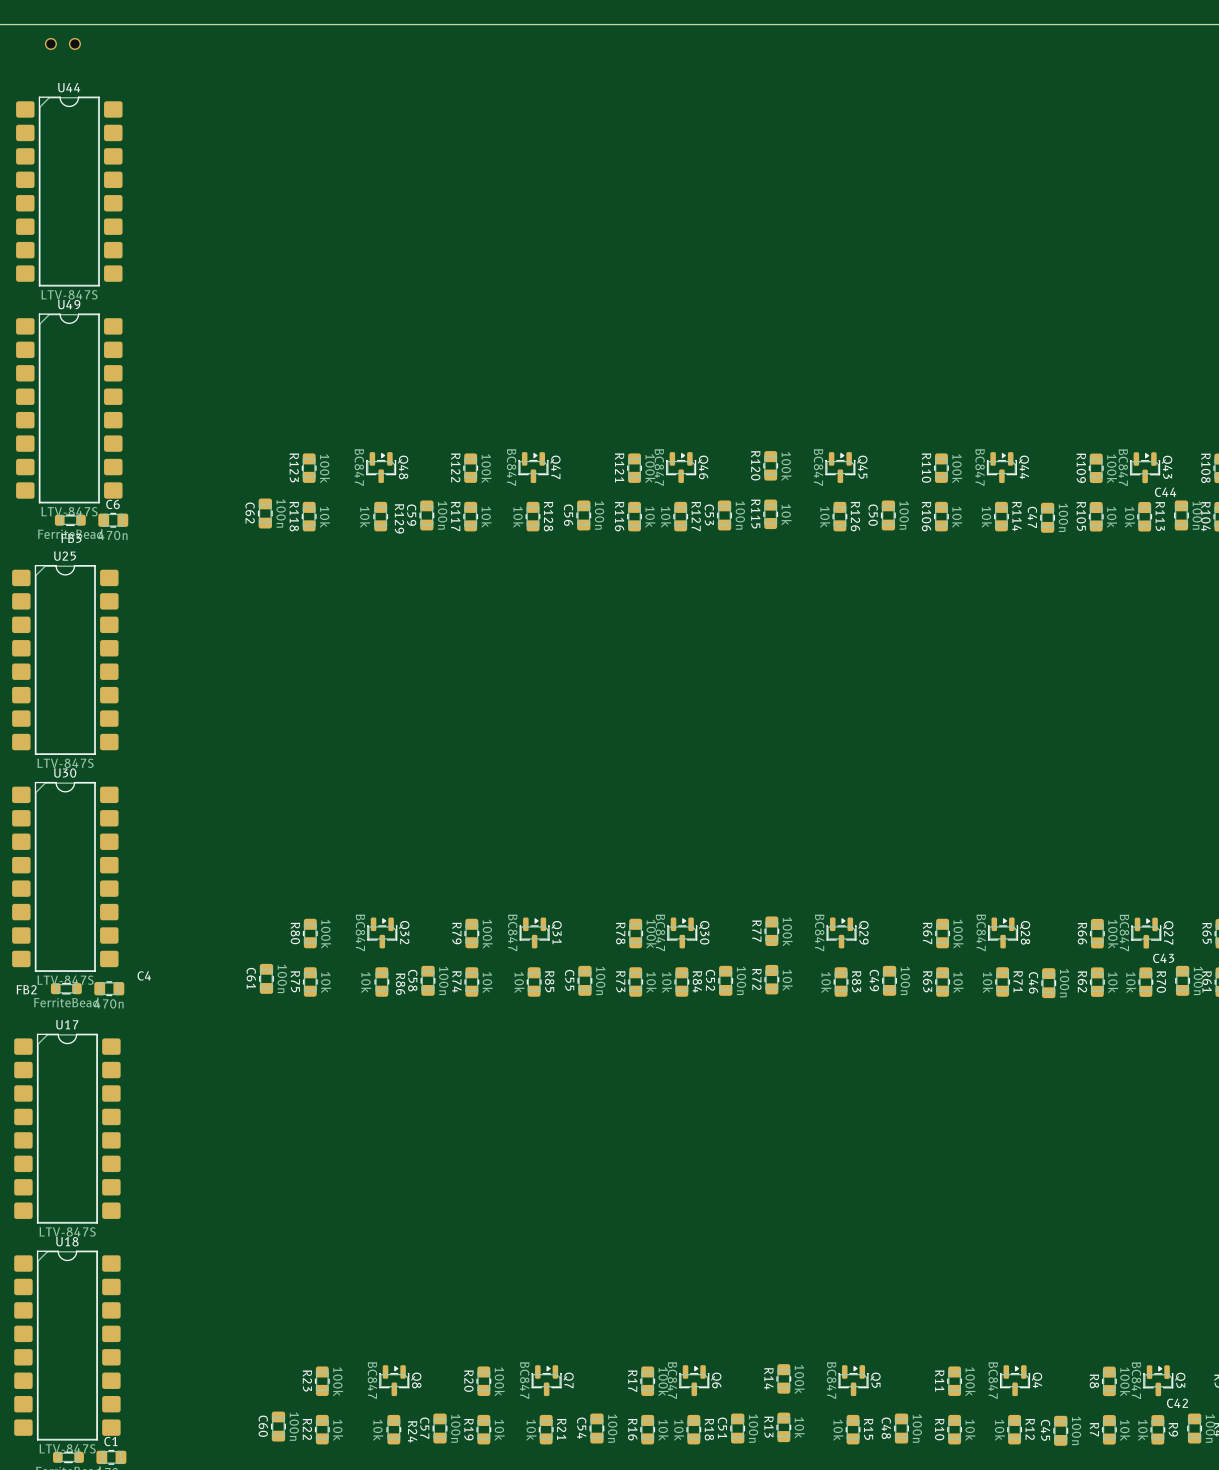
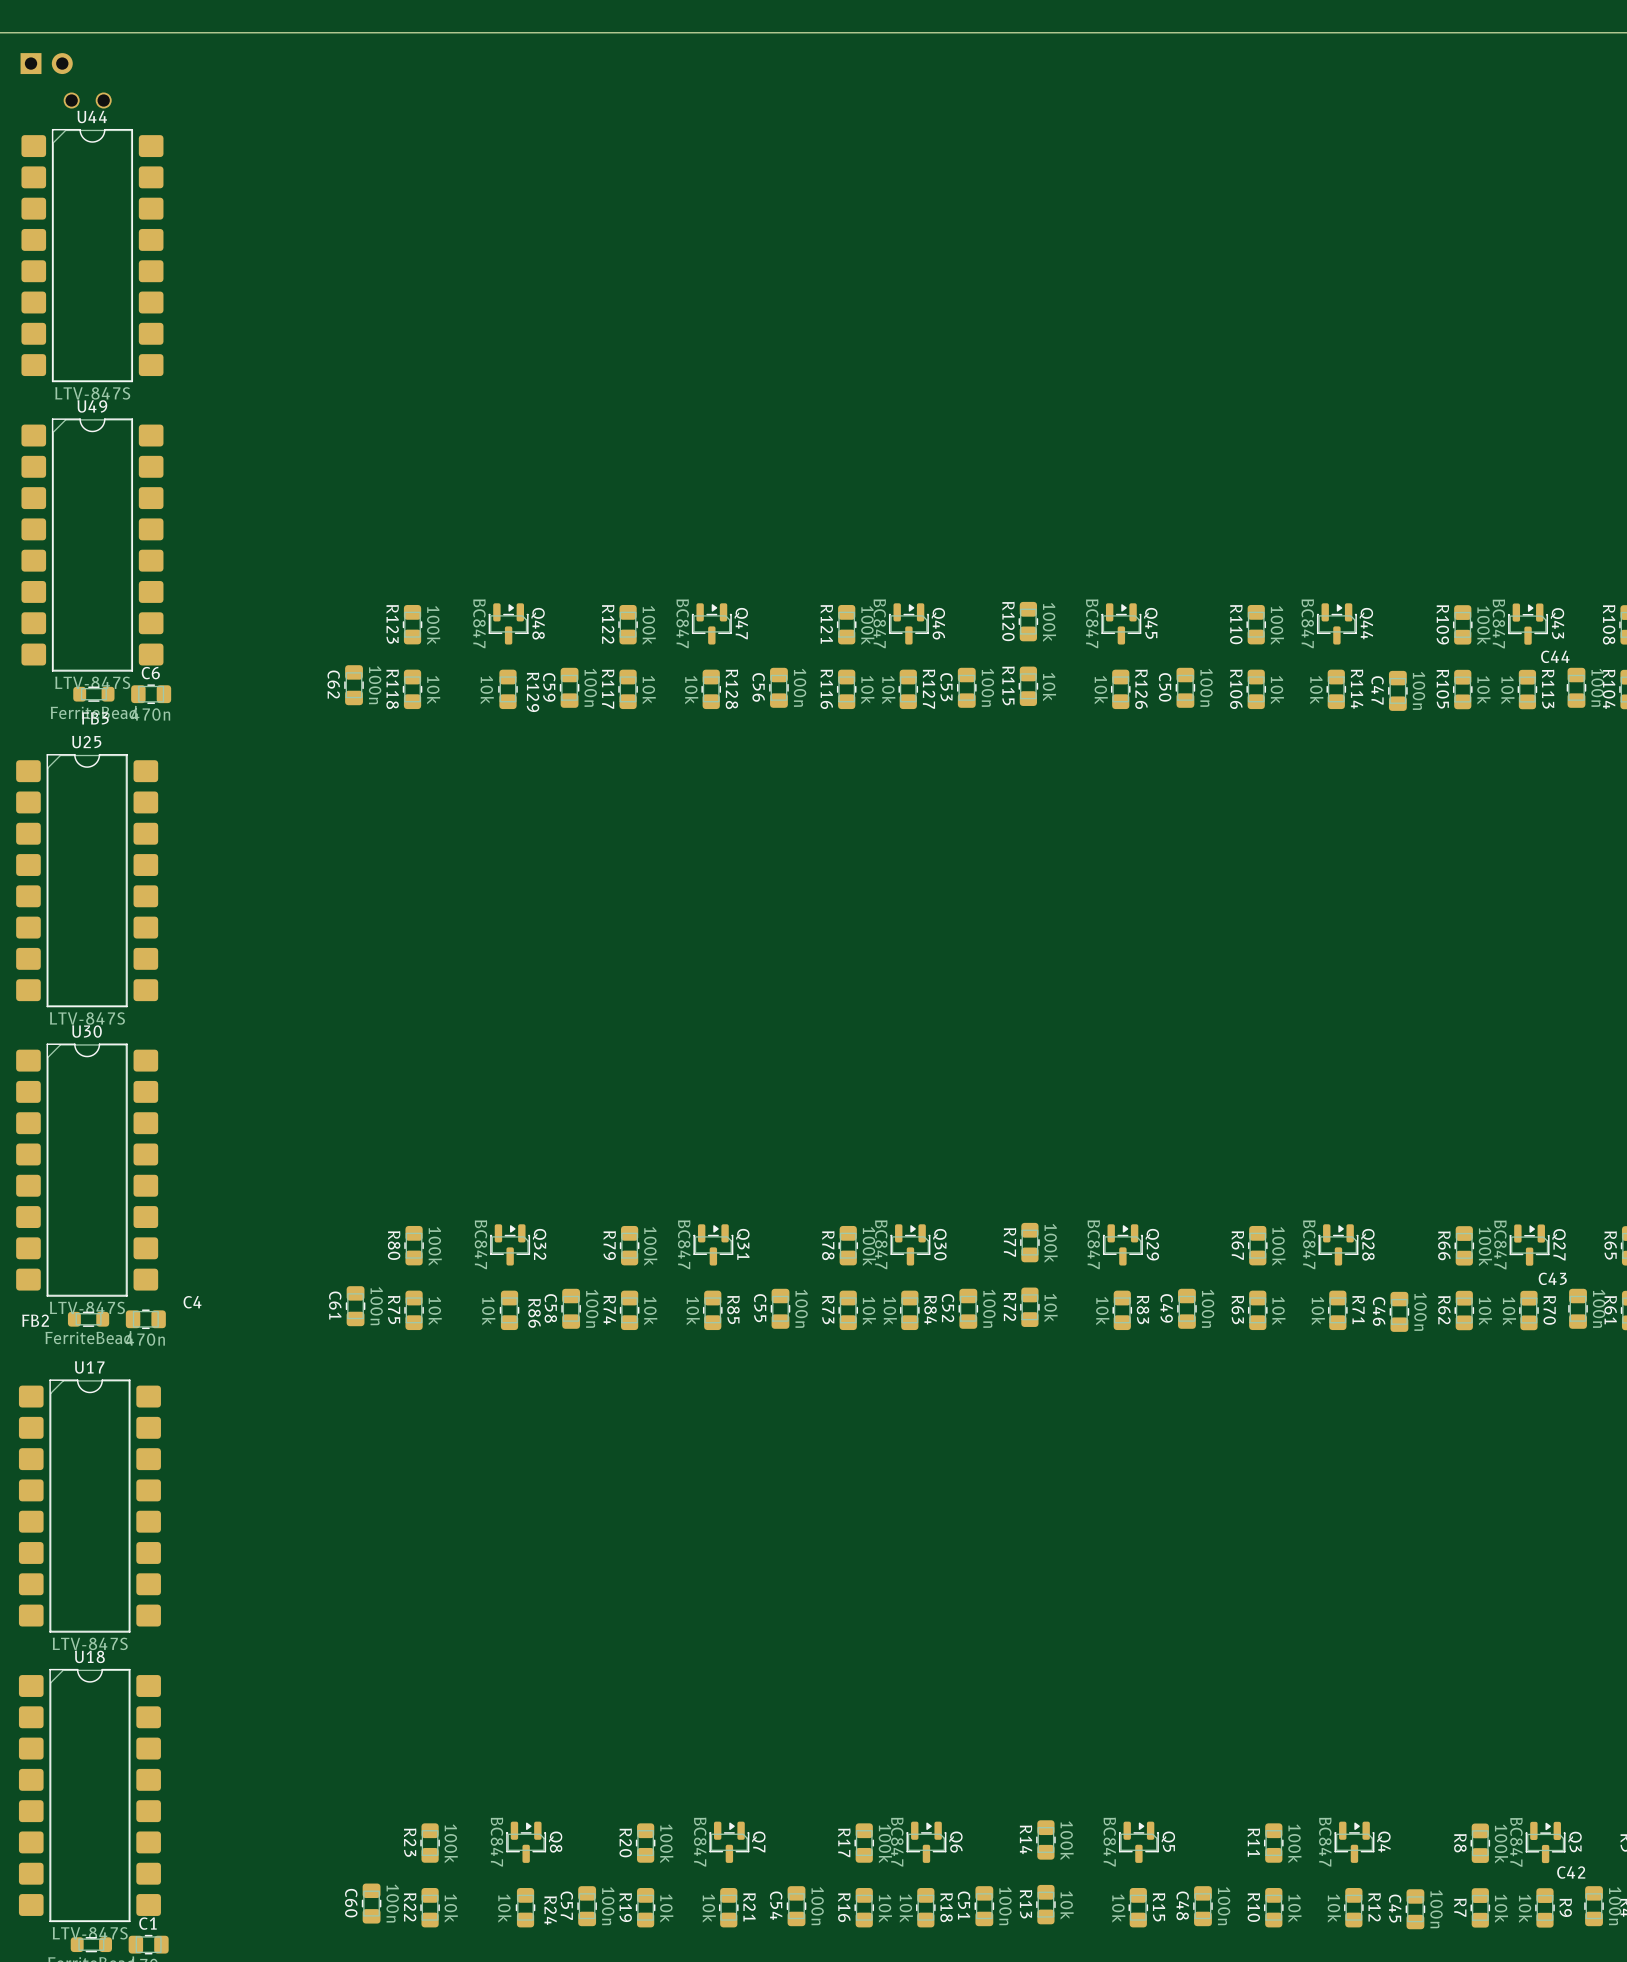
part position: (62, 43) -> (87, 100)
part: none -> (46, 63)

